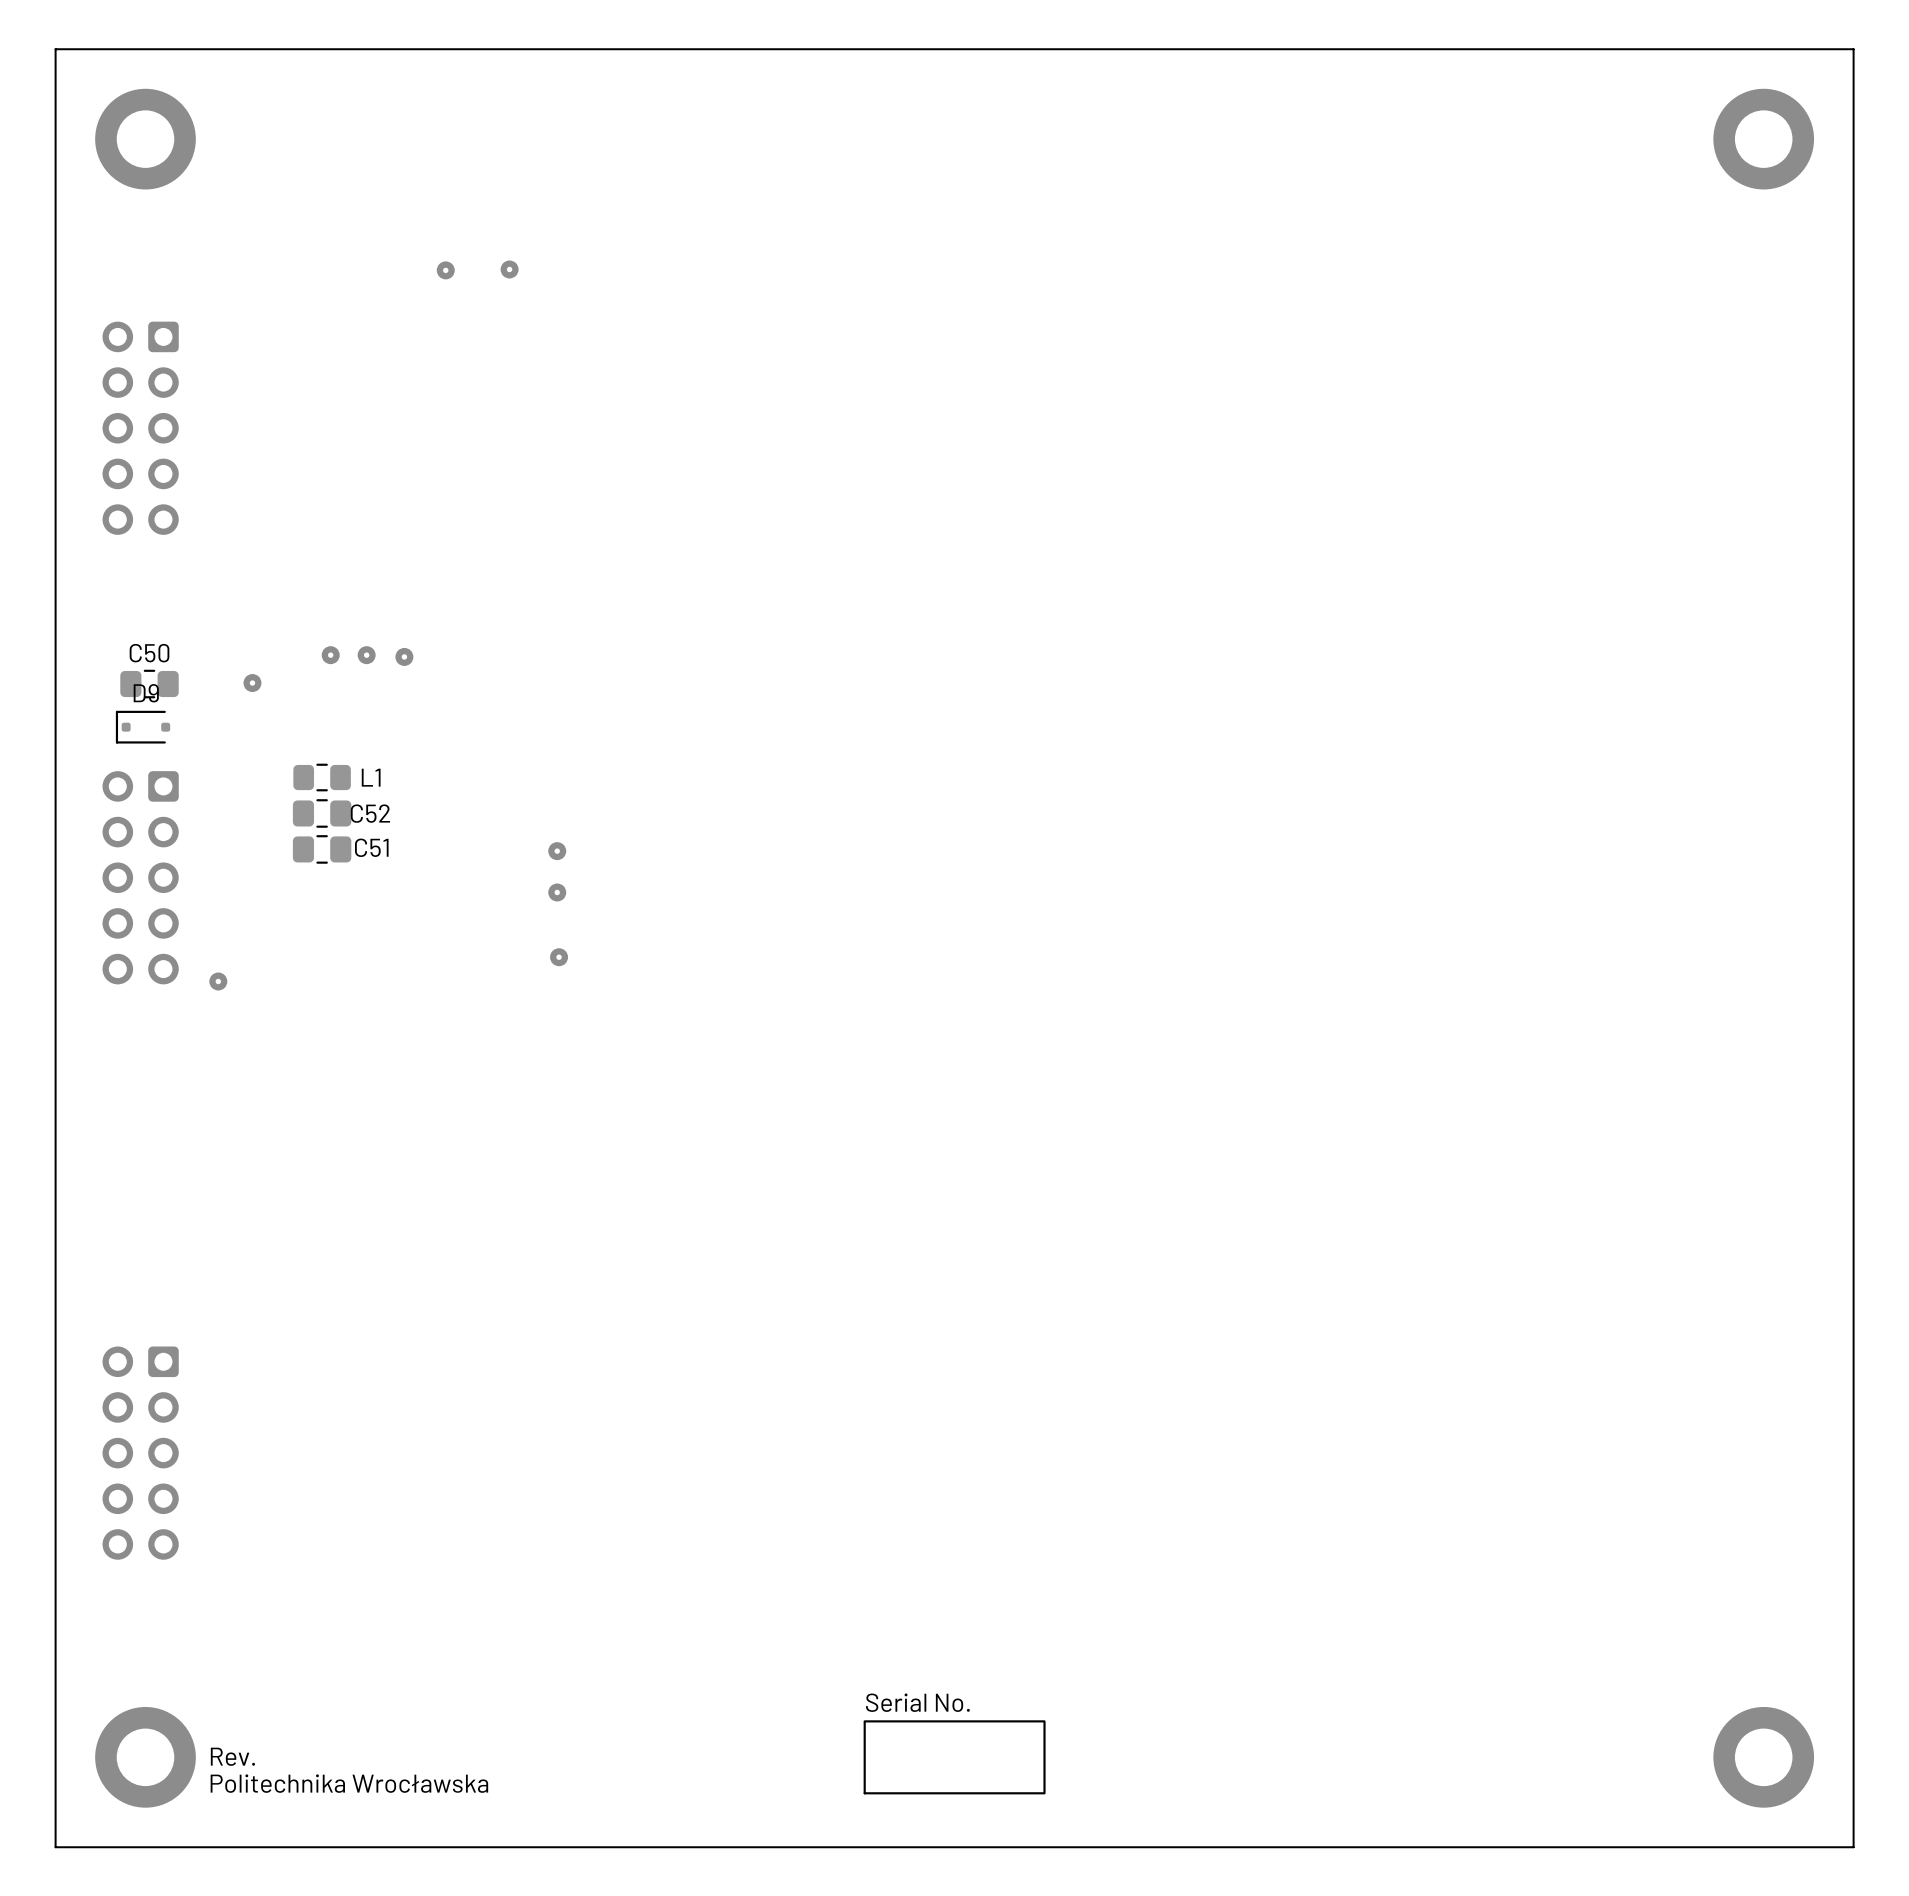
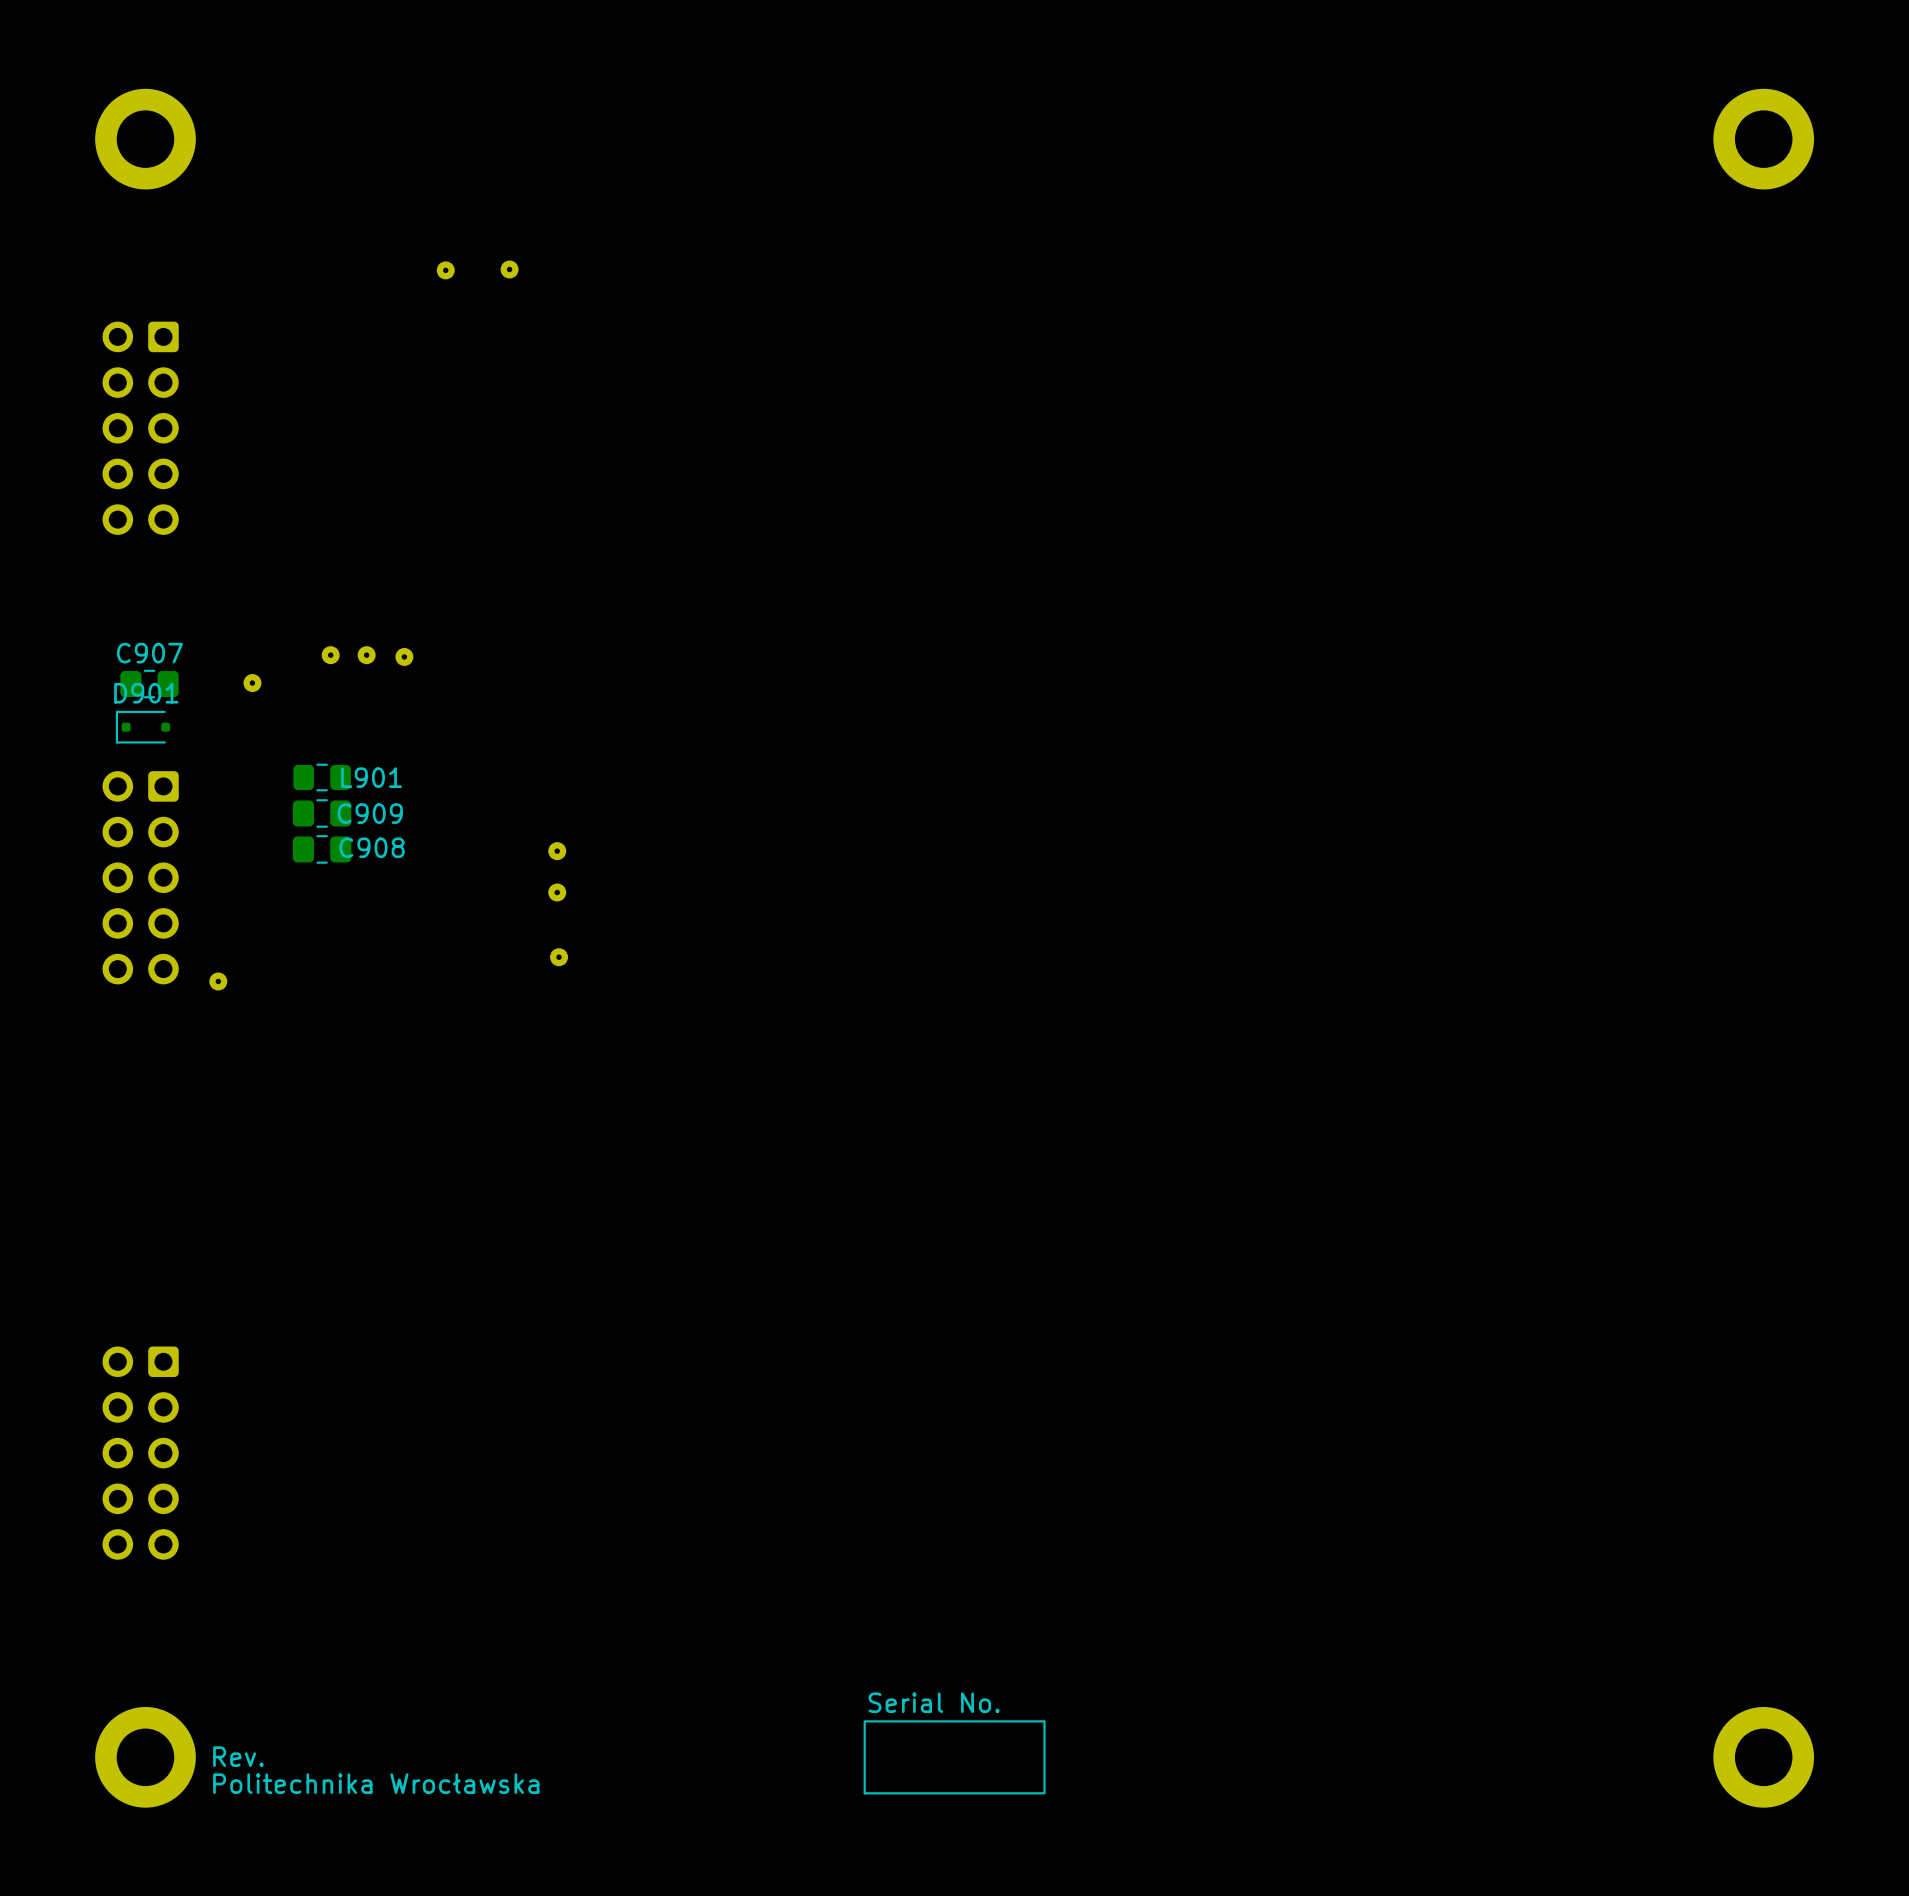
board edge: (1853, 49) (55, 49) (55, 1847) (1853, 1847) (1853, 49) -> none
C50 name: C50 (149, 653) -> C907 (149, 653)
D9 name: D9 (146, 693) -> D901 (146, 693)
L1 name: L1 (371, 777) -> L901 (371, 777)
C52 name: C52 (370, 813) -> C909 (370, 813)
C51 name: C51 (371, 847) -> C908 (372, 847)

